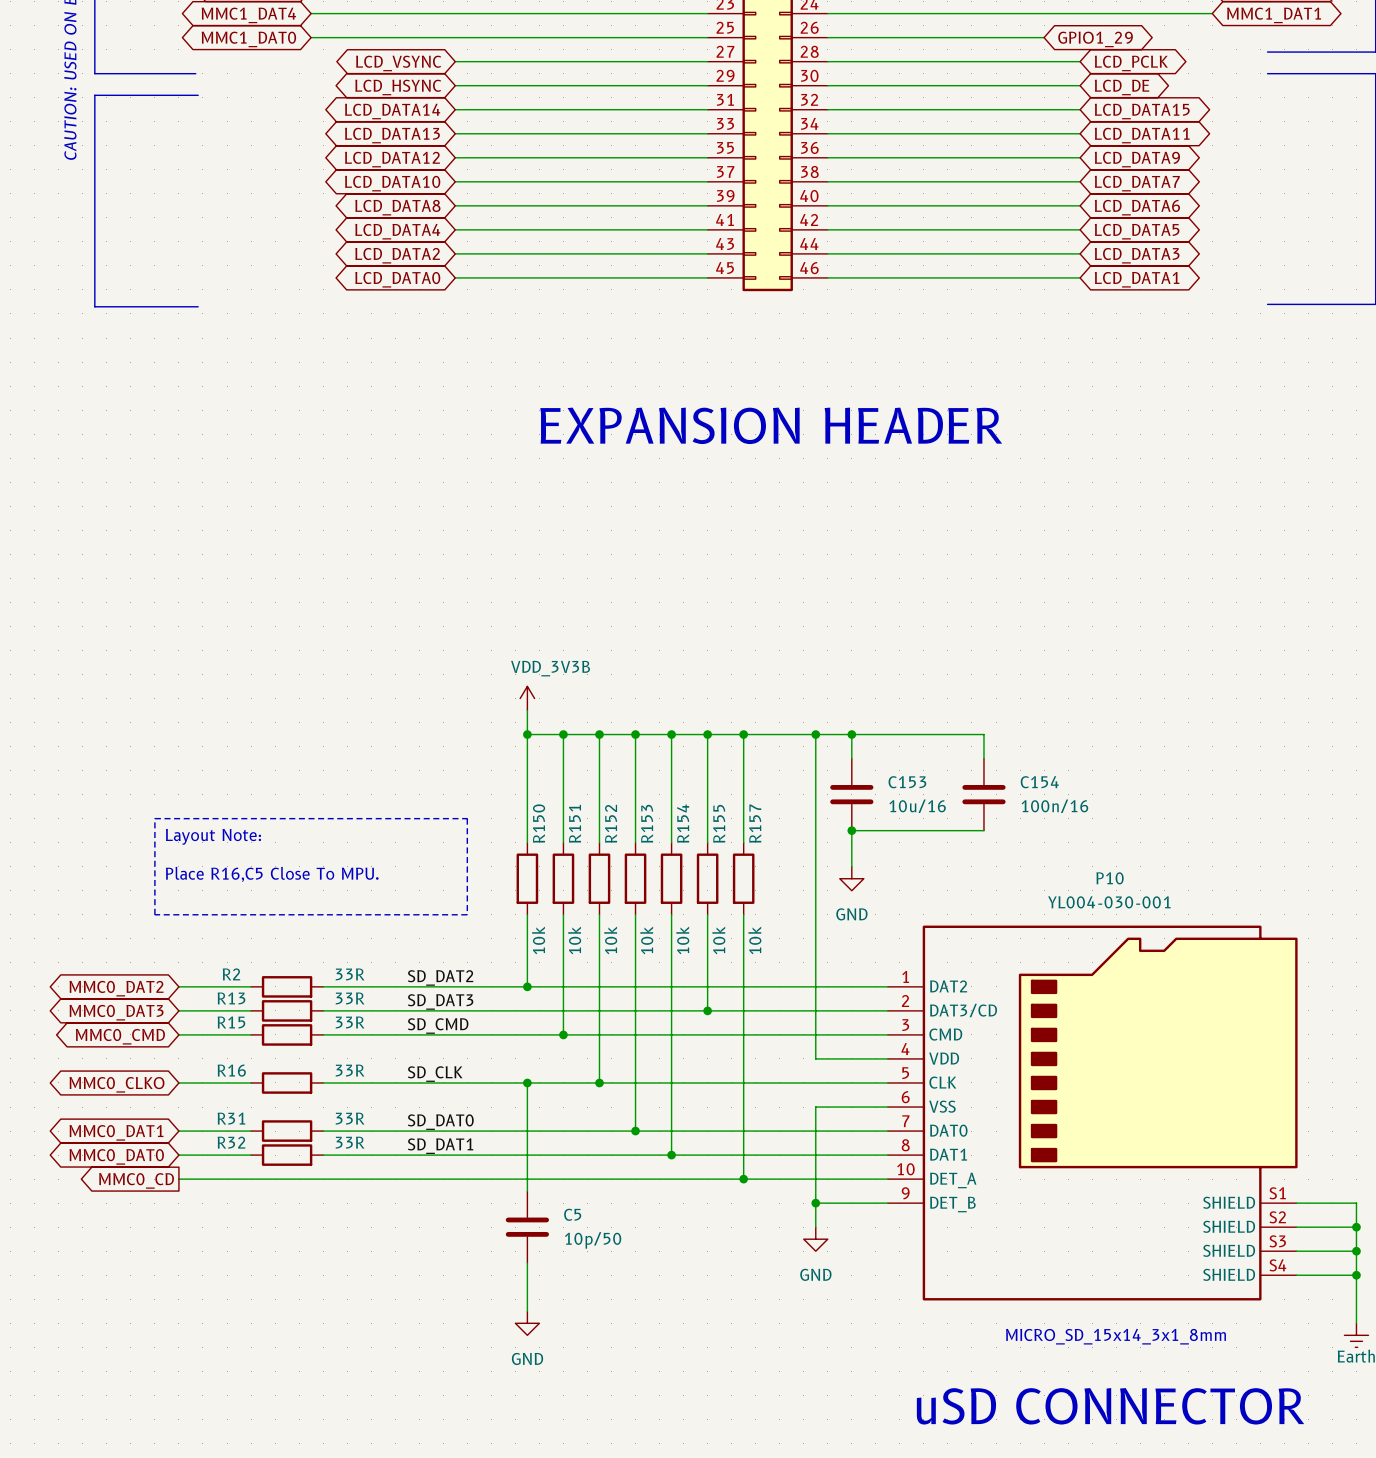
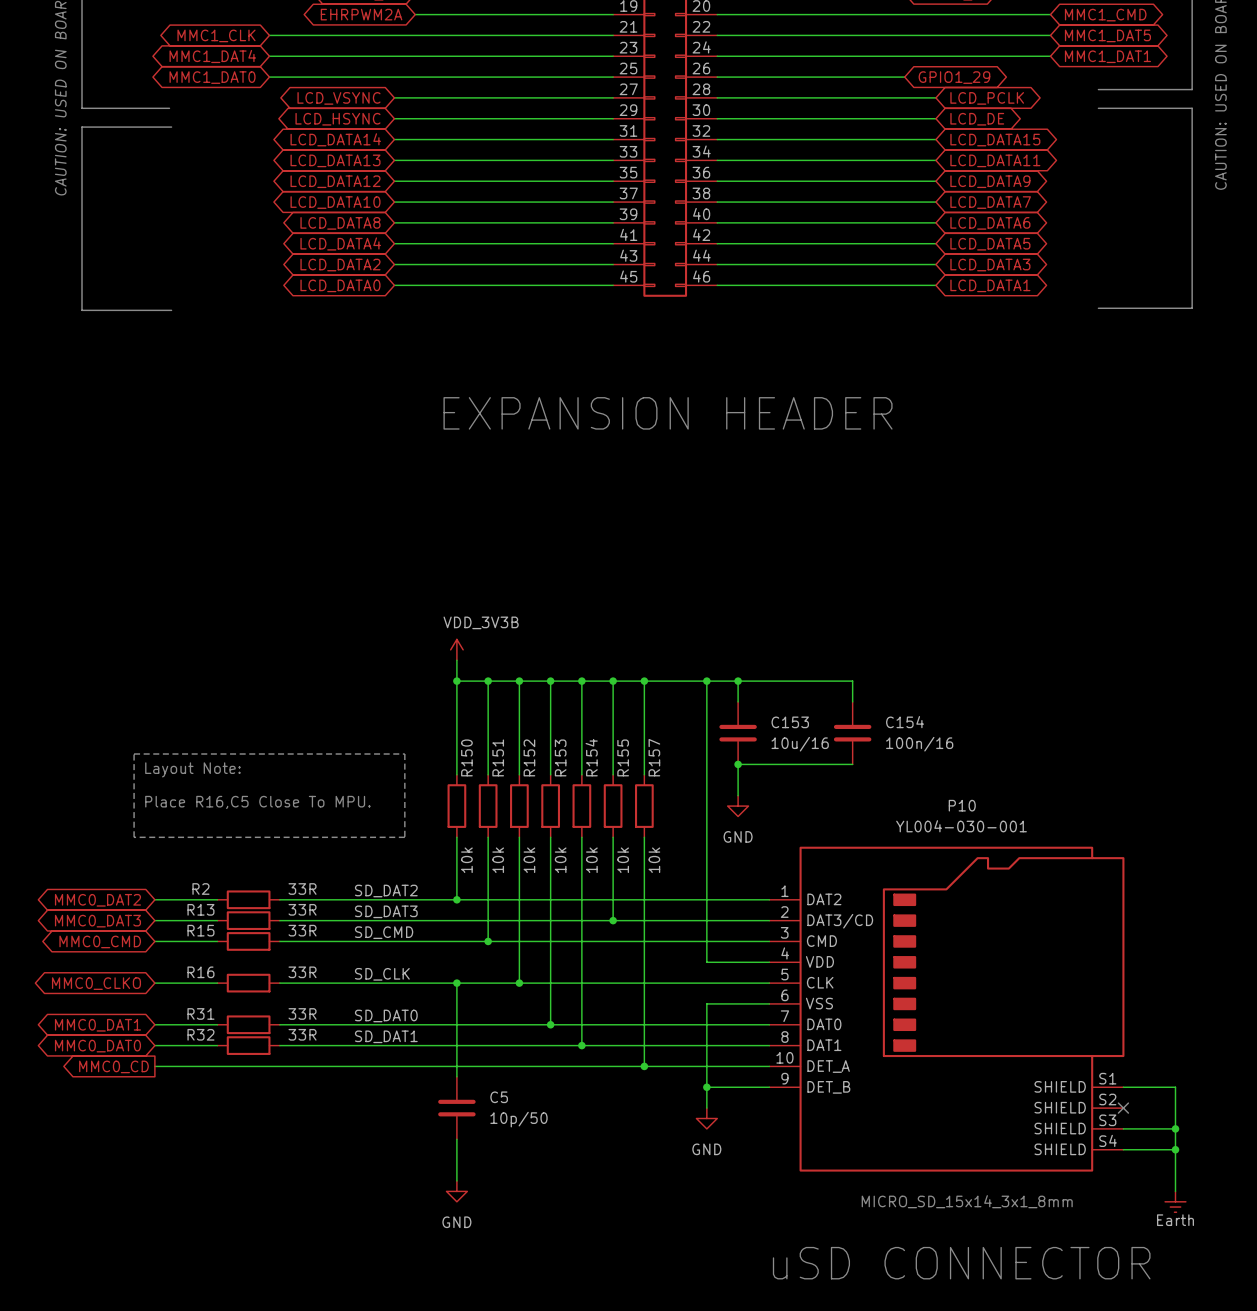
wire: (1296, 1227) (1356, 1227) -> none
no-connect mark: none -> (1123, 1108)
junction: (1356, 1227) -> none

